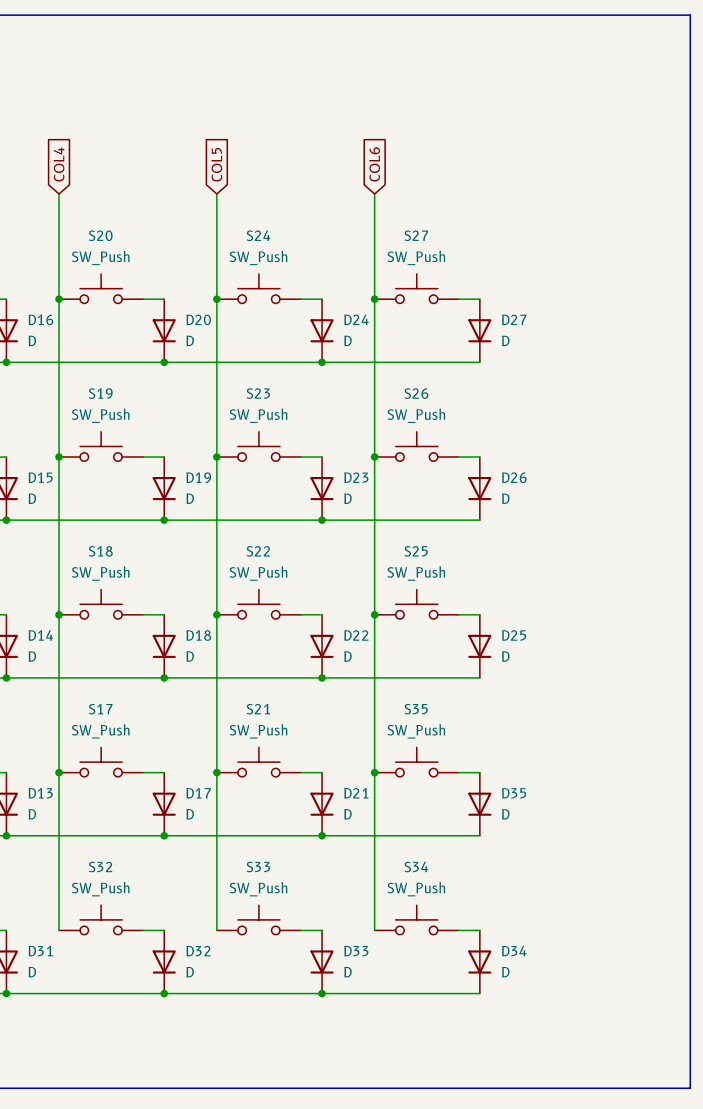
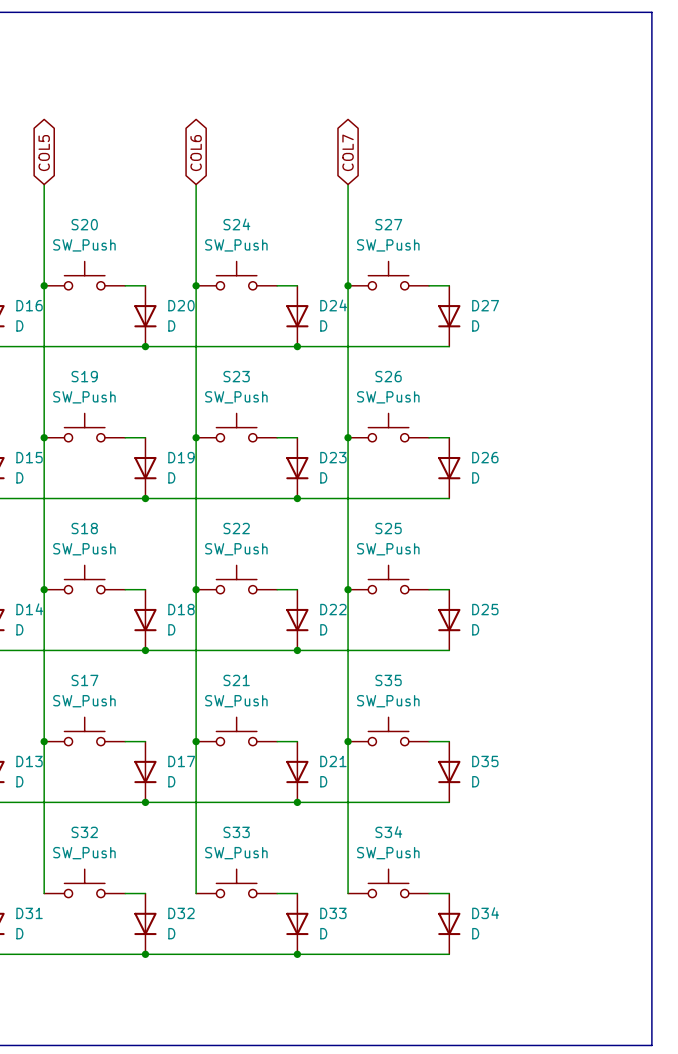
global label shape: input (59, 164) -> bidirectional (44, 153)
global label: COL4 (59, 164) -> COL5 (44, 153)
global label shape: input (216, 164) -> bidirectional (196, 153)
global label: COL5 (216, 164) -> COL6 (196, 153)
global label shape: input (374, 164) -> bidirectional (348, 152)
global label: COL6 (374, 164) -> COL7 (348, 152)

